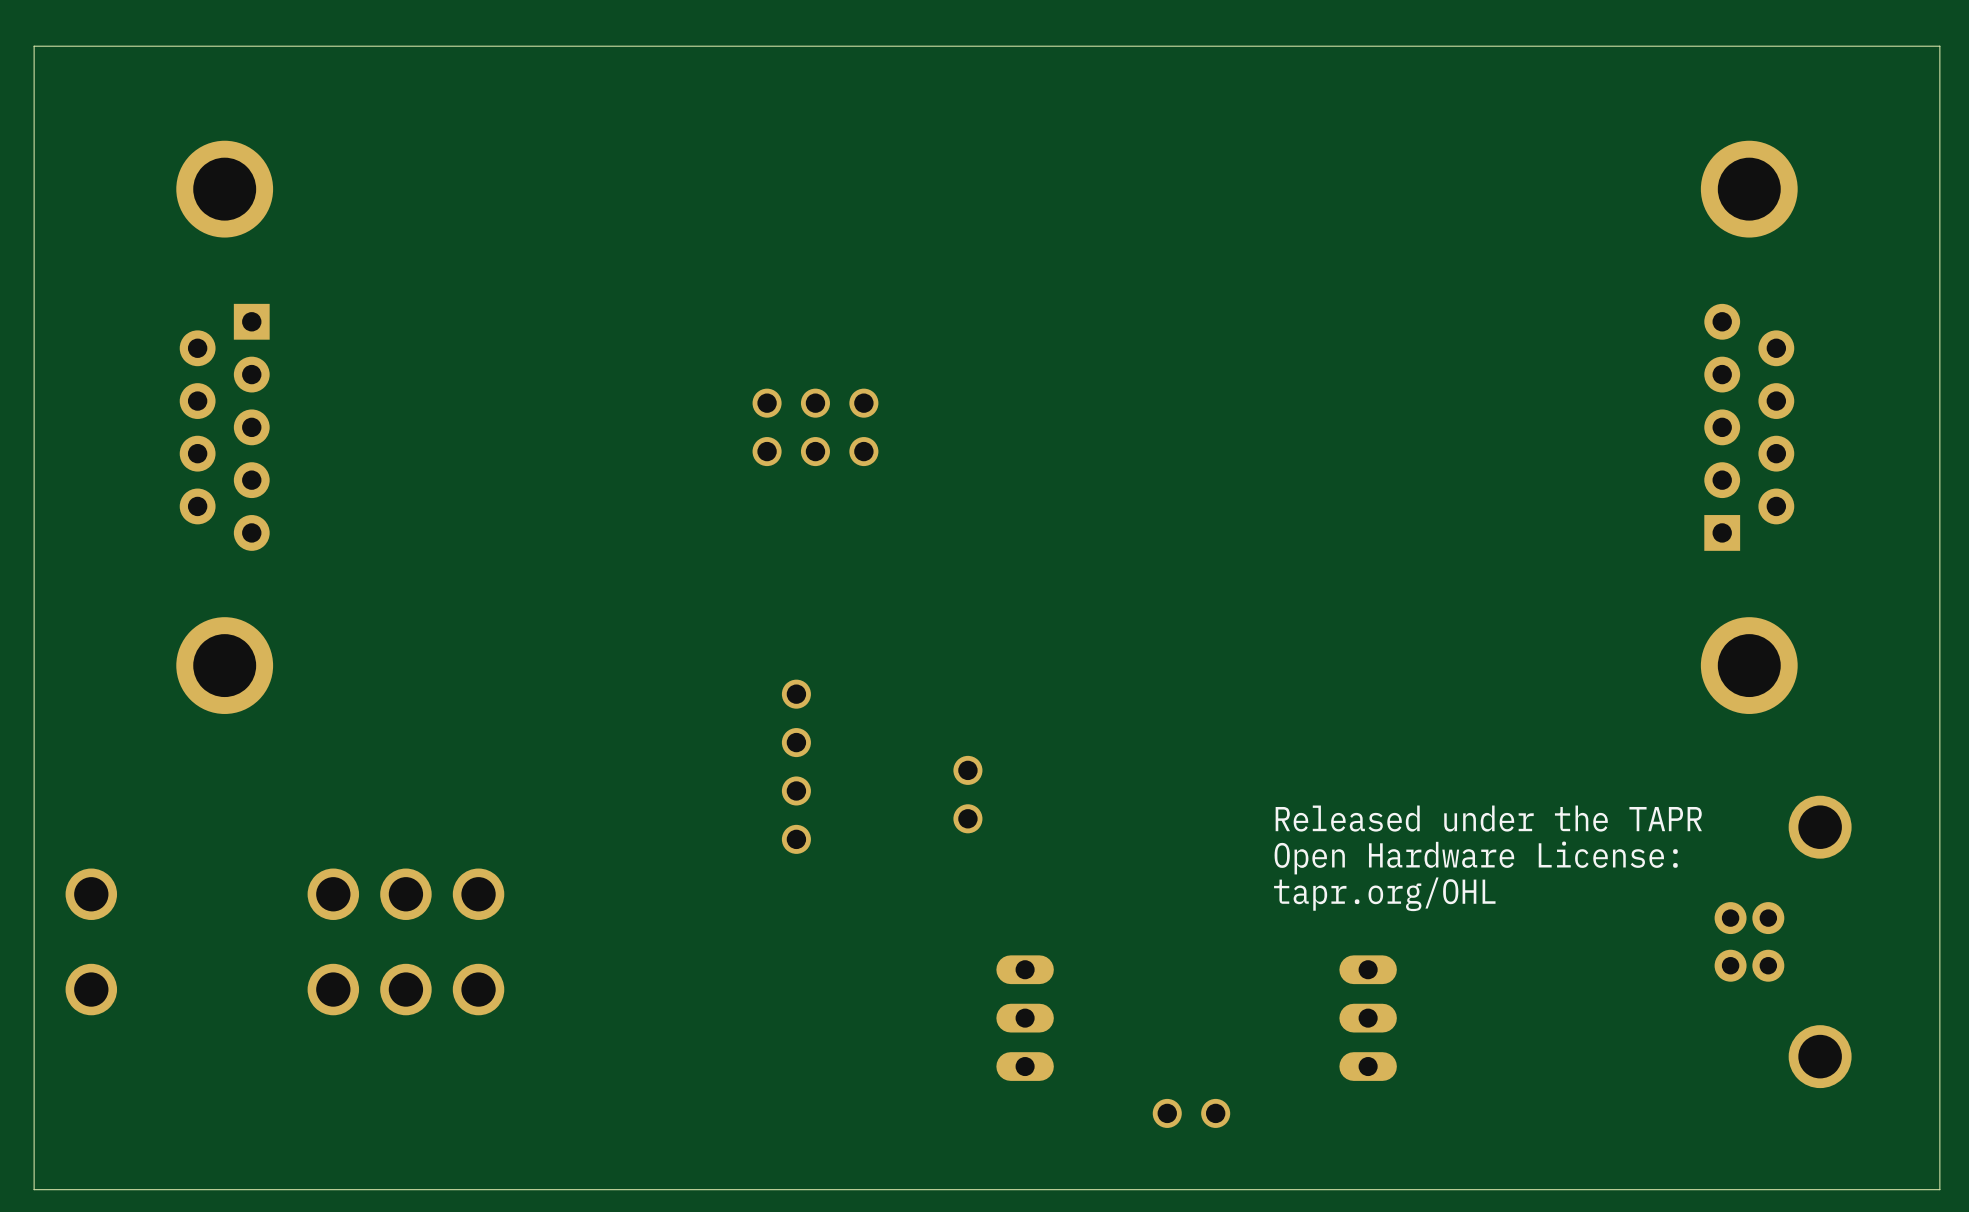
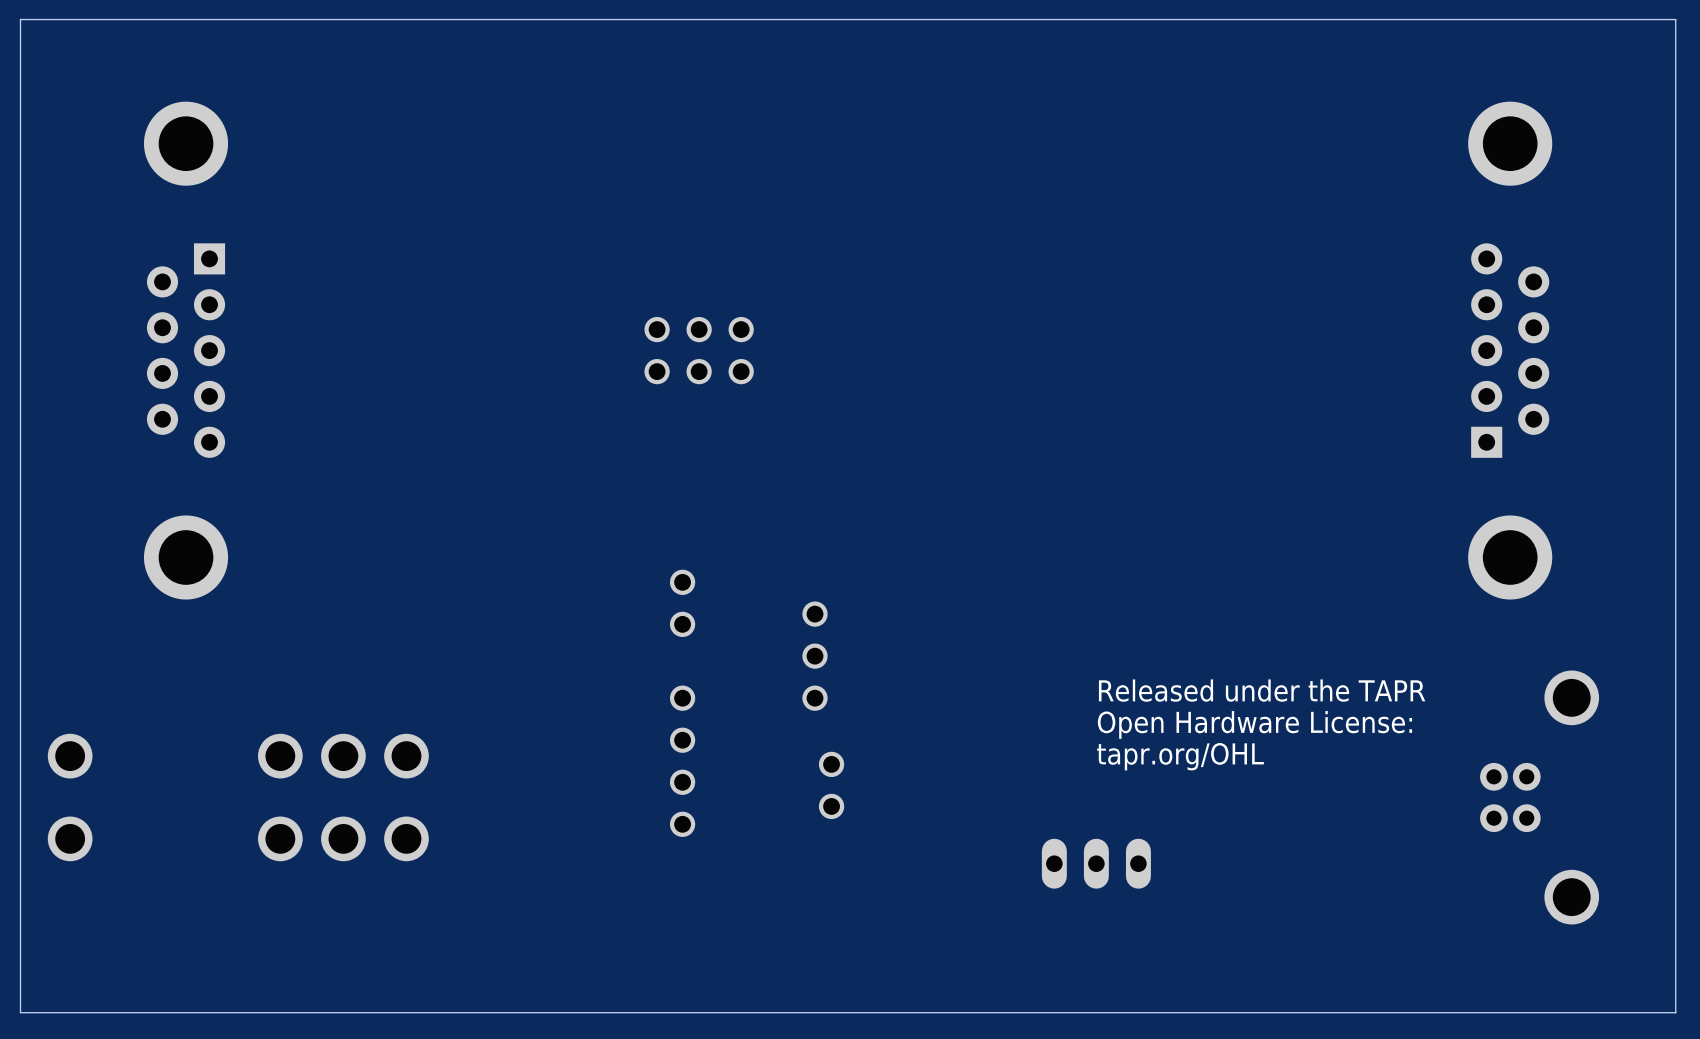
part position: (796, 766) -> (682, 761)
part: none -> (815, 656)
part: (967, 794) -> none
part: none -> (831, 785)
part: (1025, 1018) -> none
part rotation: 0° (1368, 1018) -> 90° clockwise (1096, 863)
part position: (1368, 1018) -> (1096, 863)
part: (1191, 1113) -> none

